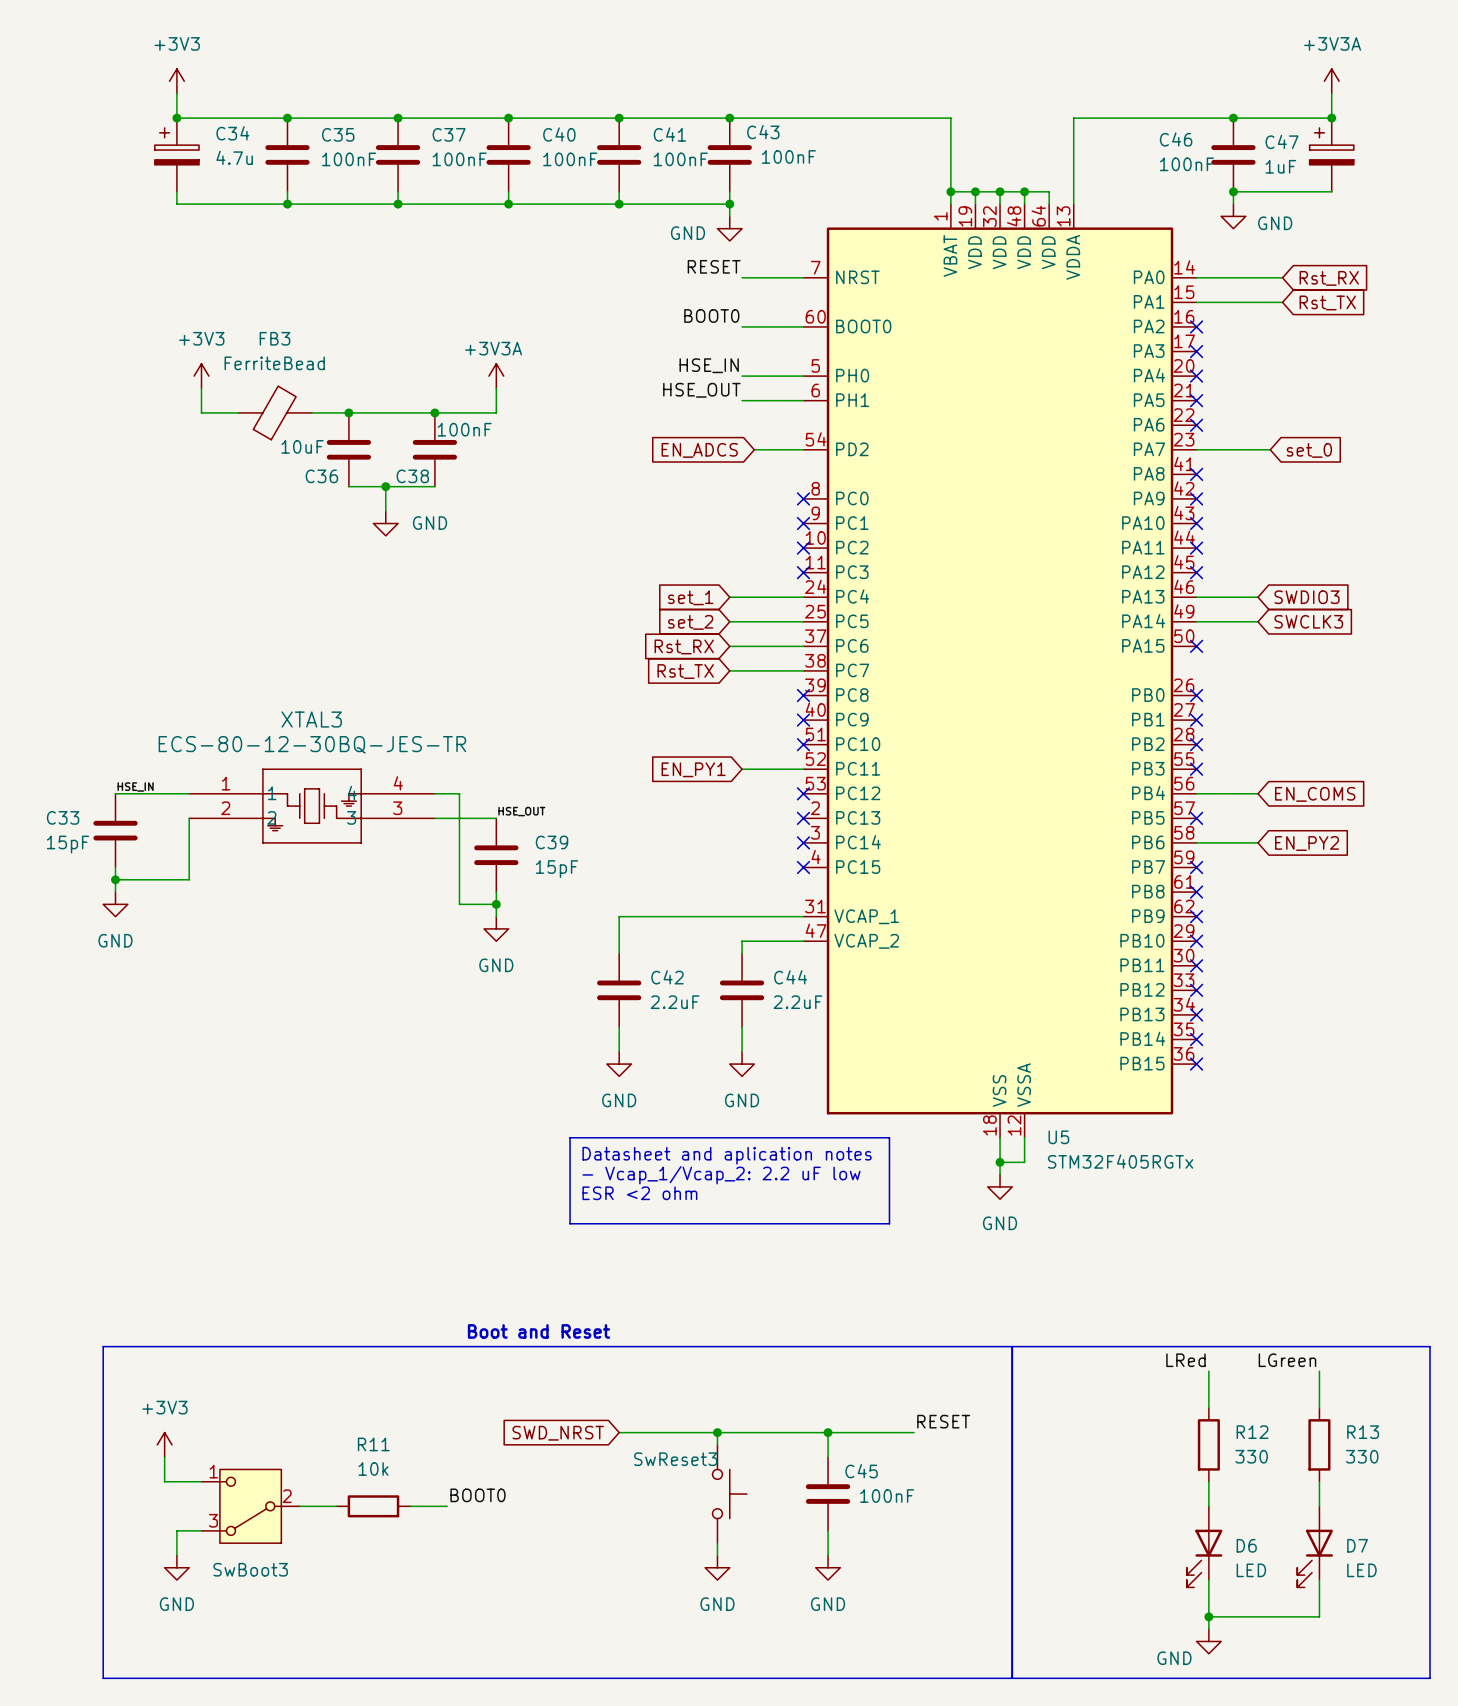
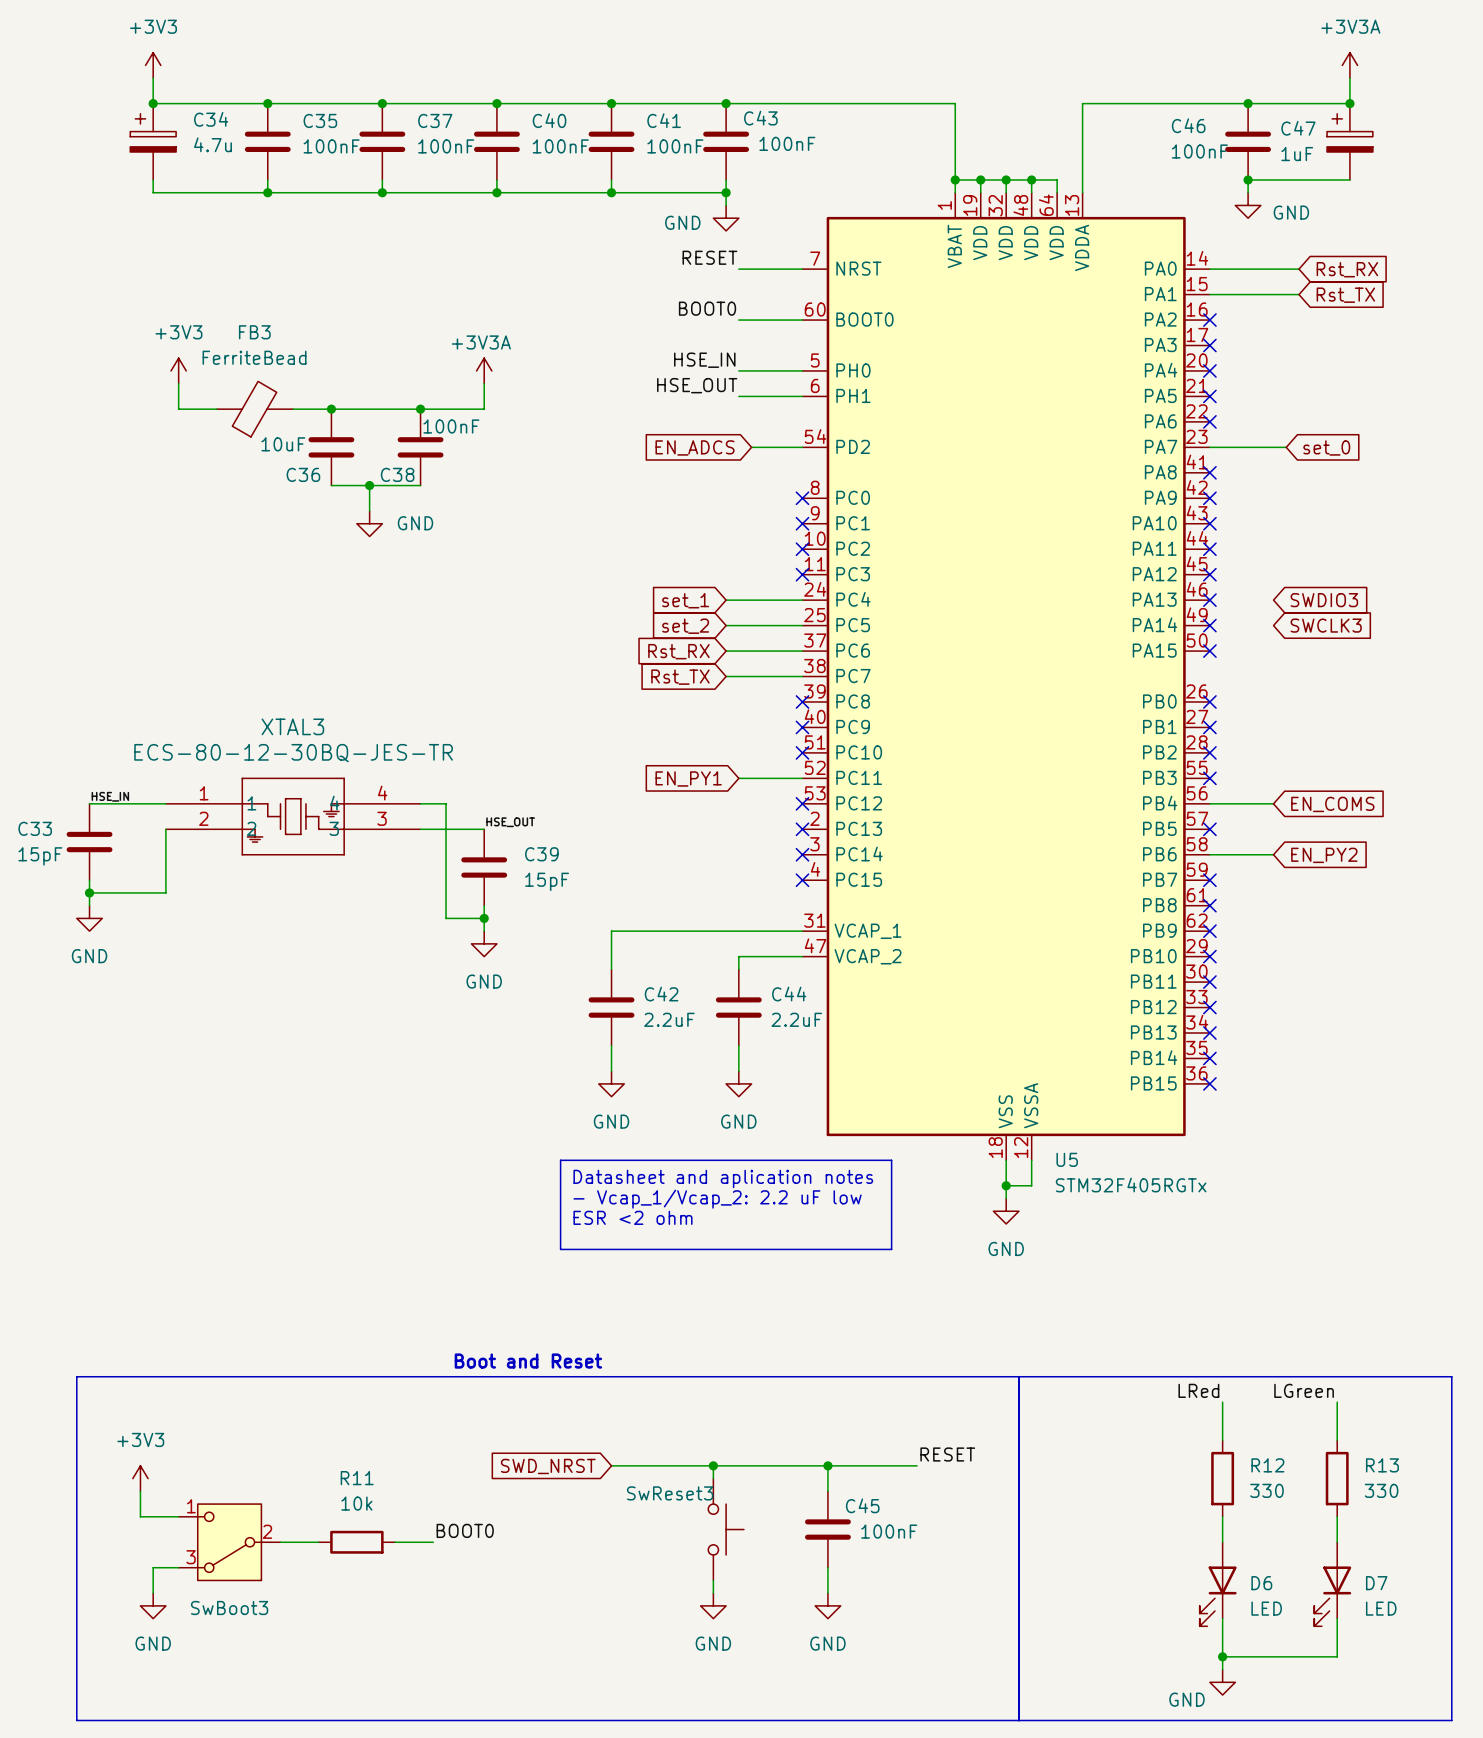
wire: (1196, 597) (1258, 597) -> none
no-connect mark: none -> (1209, 600)
wire: (1196, 621) (1258, 621) -> none
no-connect mark: none -> (1209, 625)

